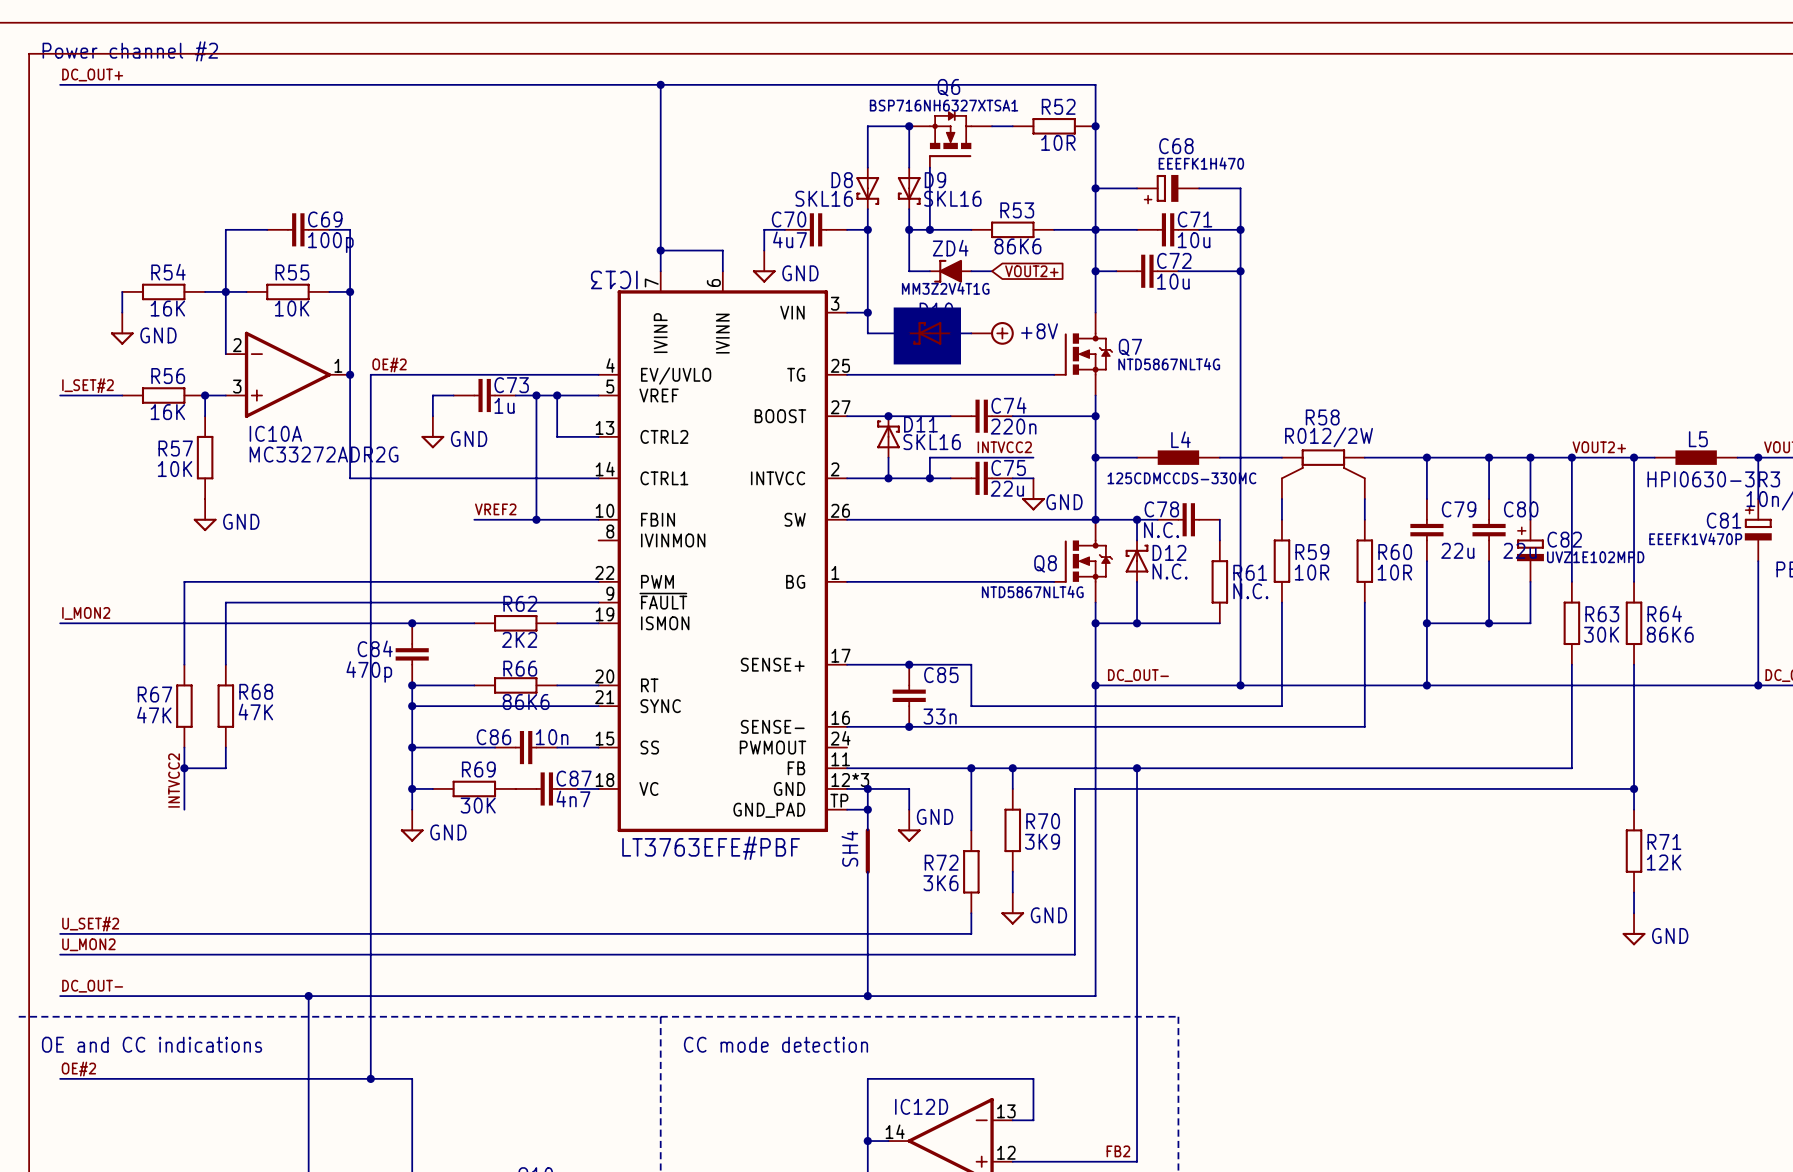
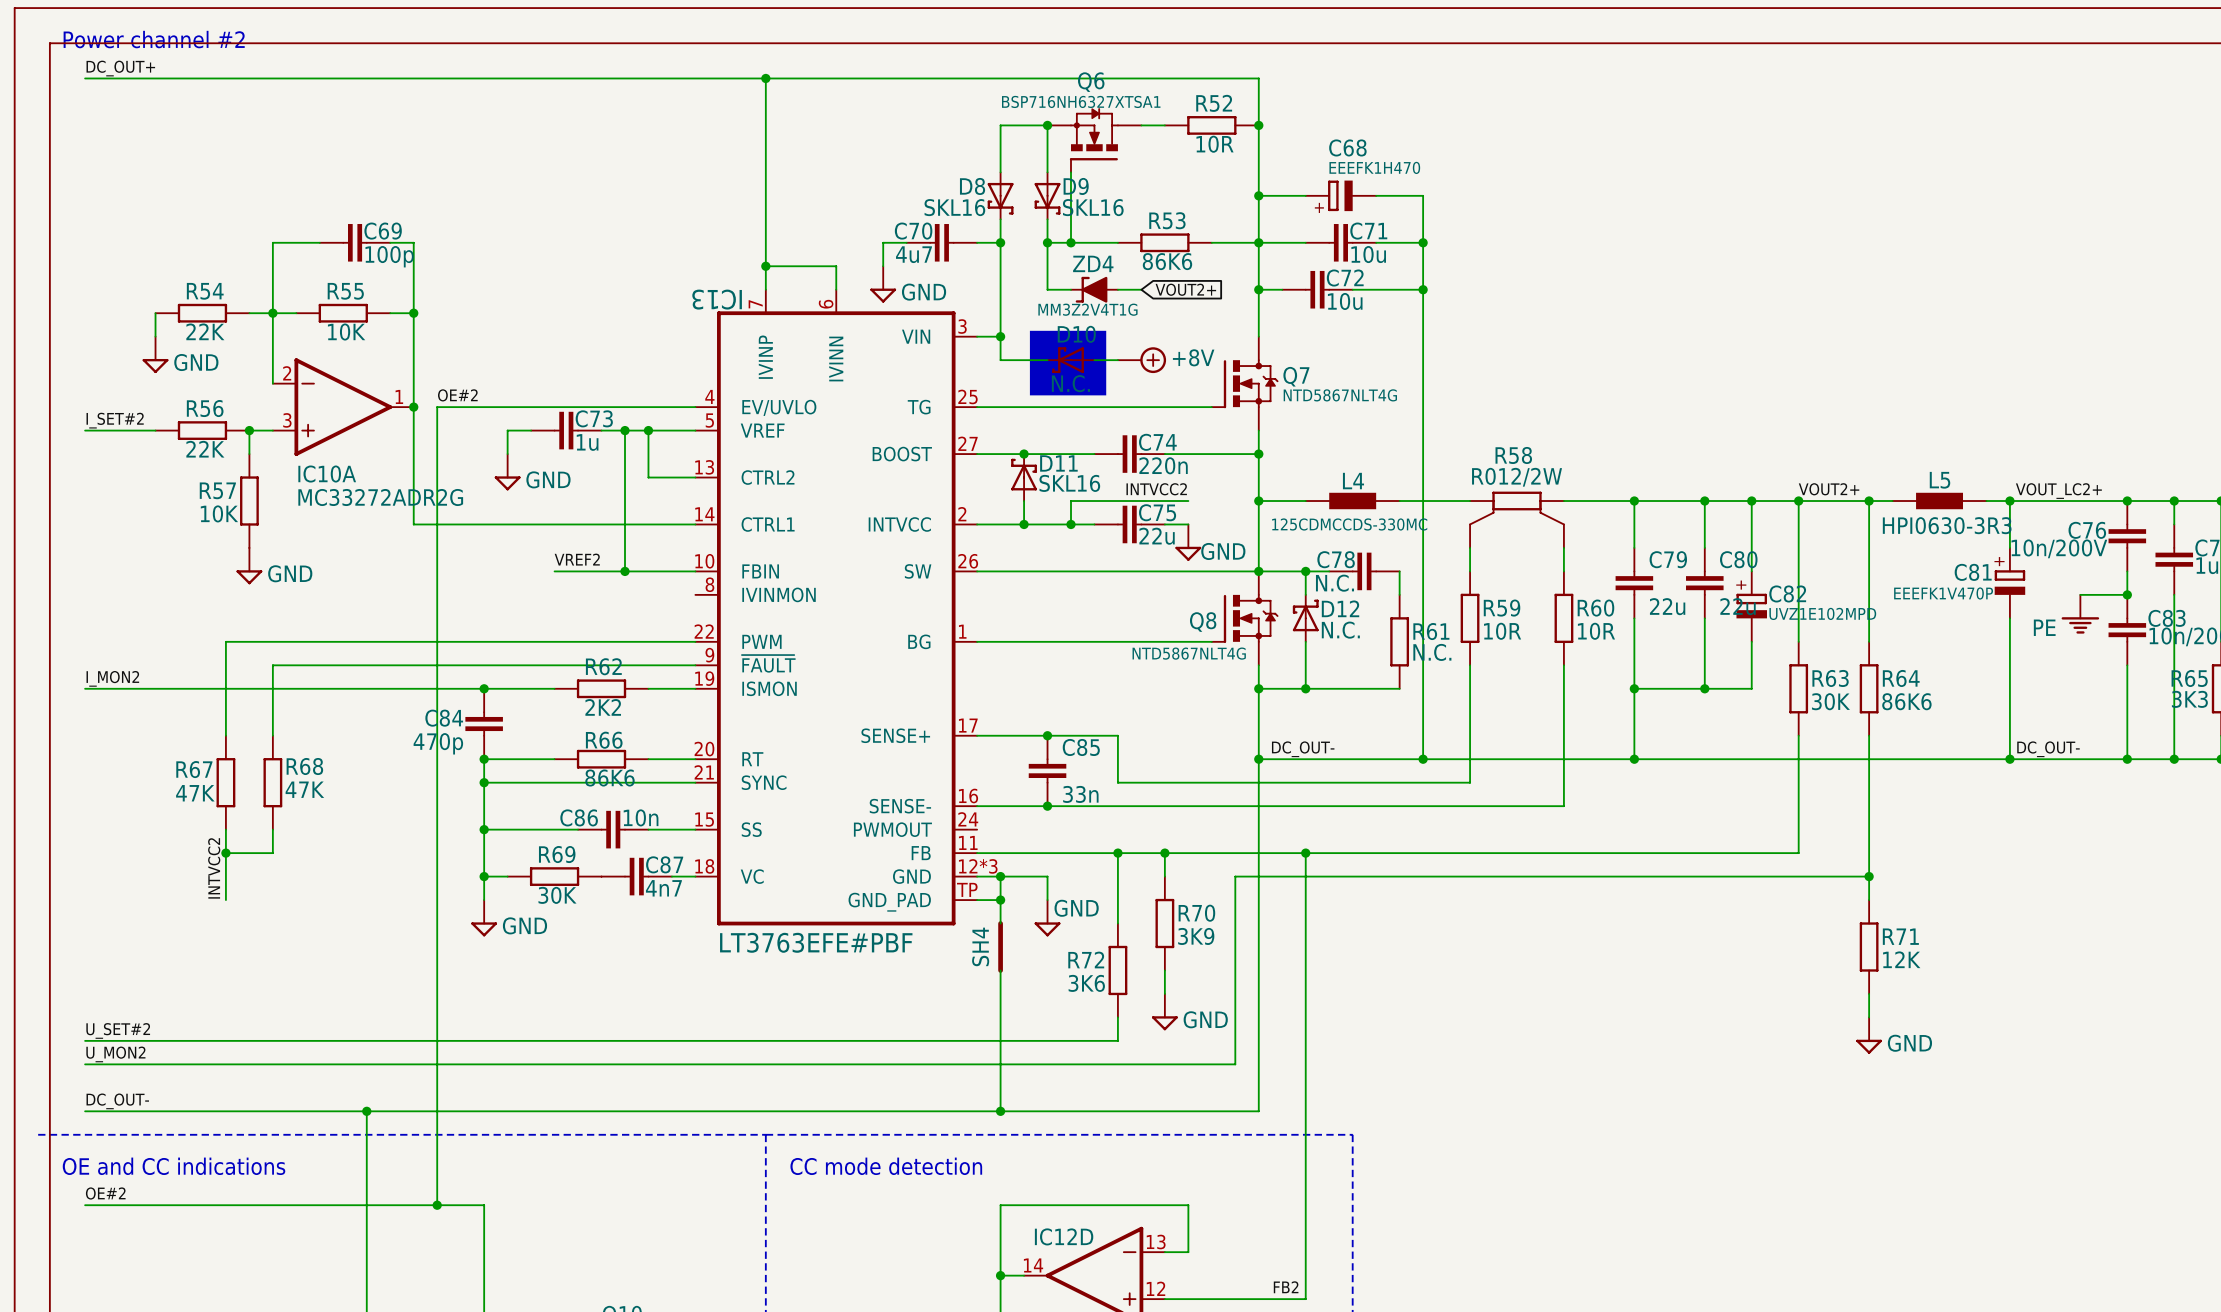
R54 value: 16K (167, 308) -> 22K (205, 331)
R56 value: 16K (167, 412) -> 22K (205, 449)

